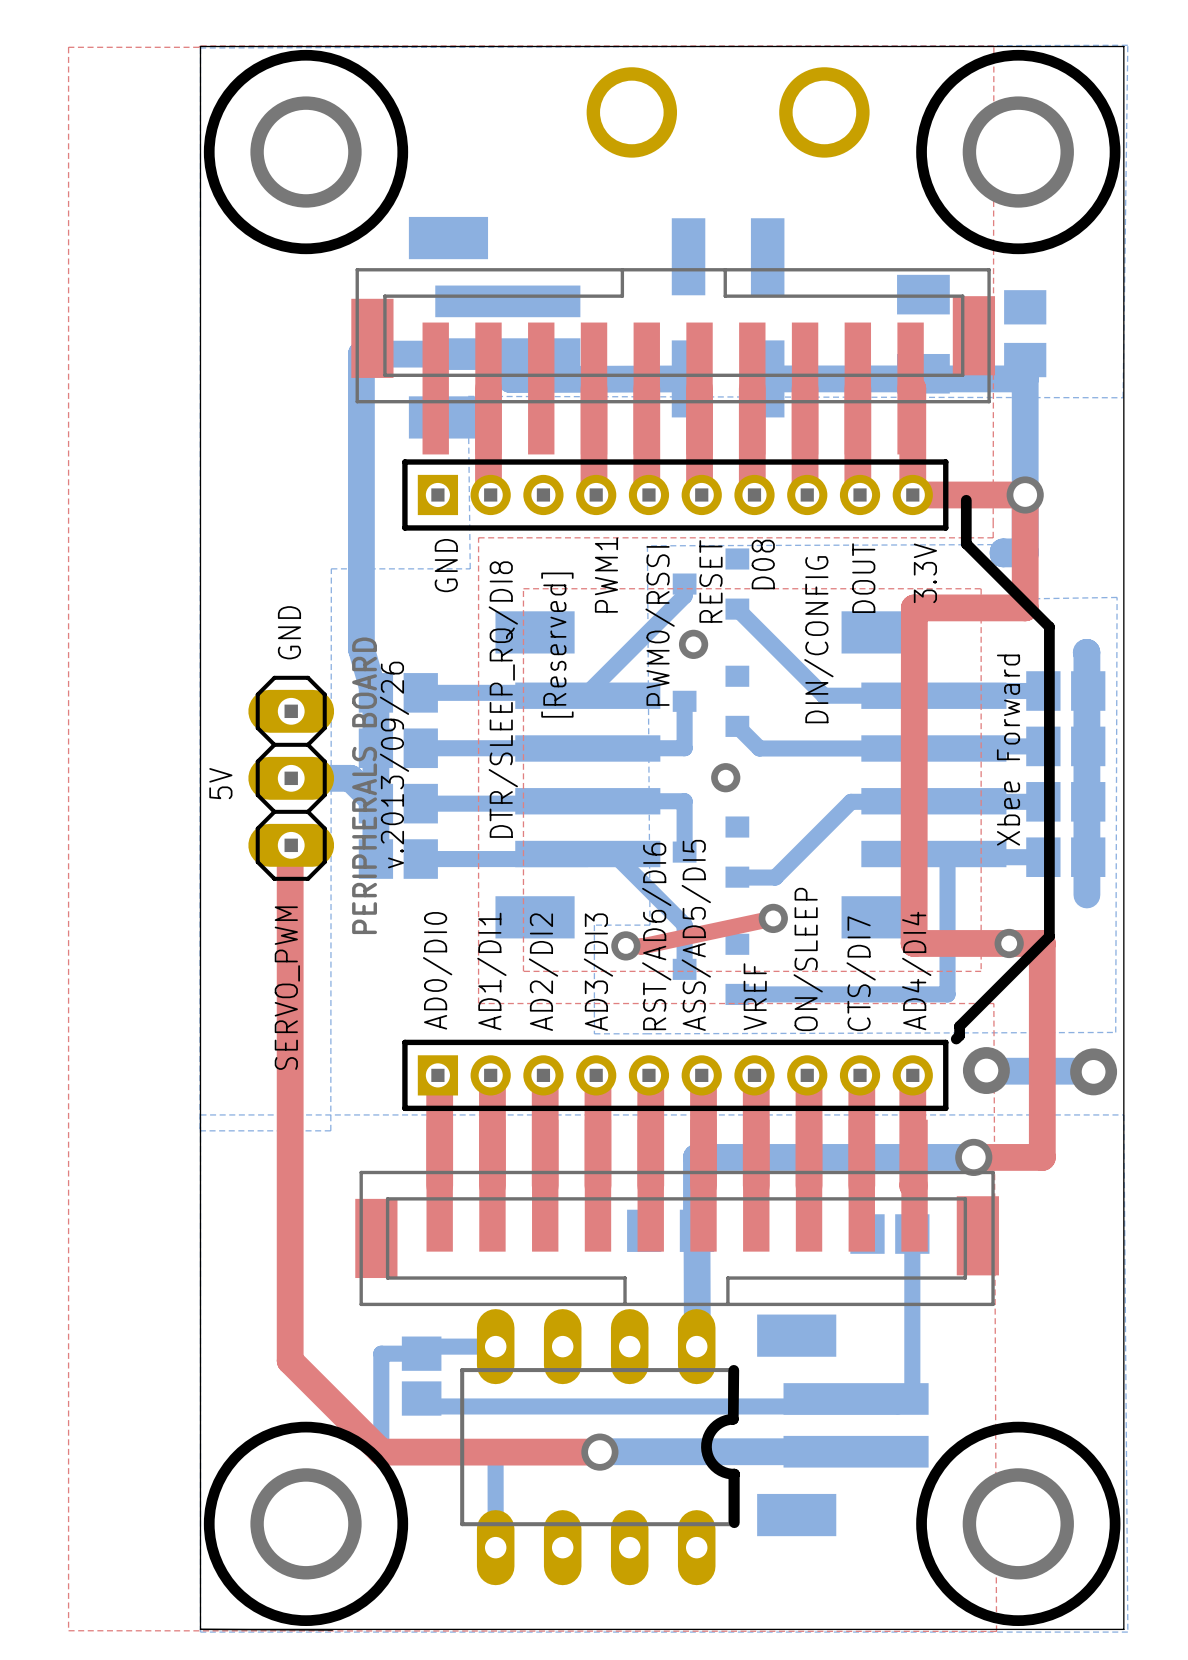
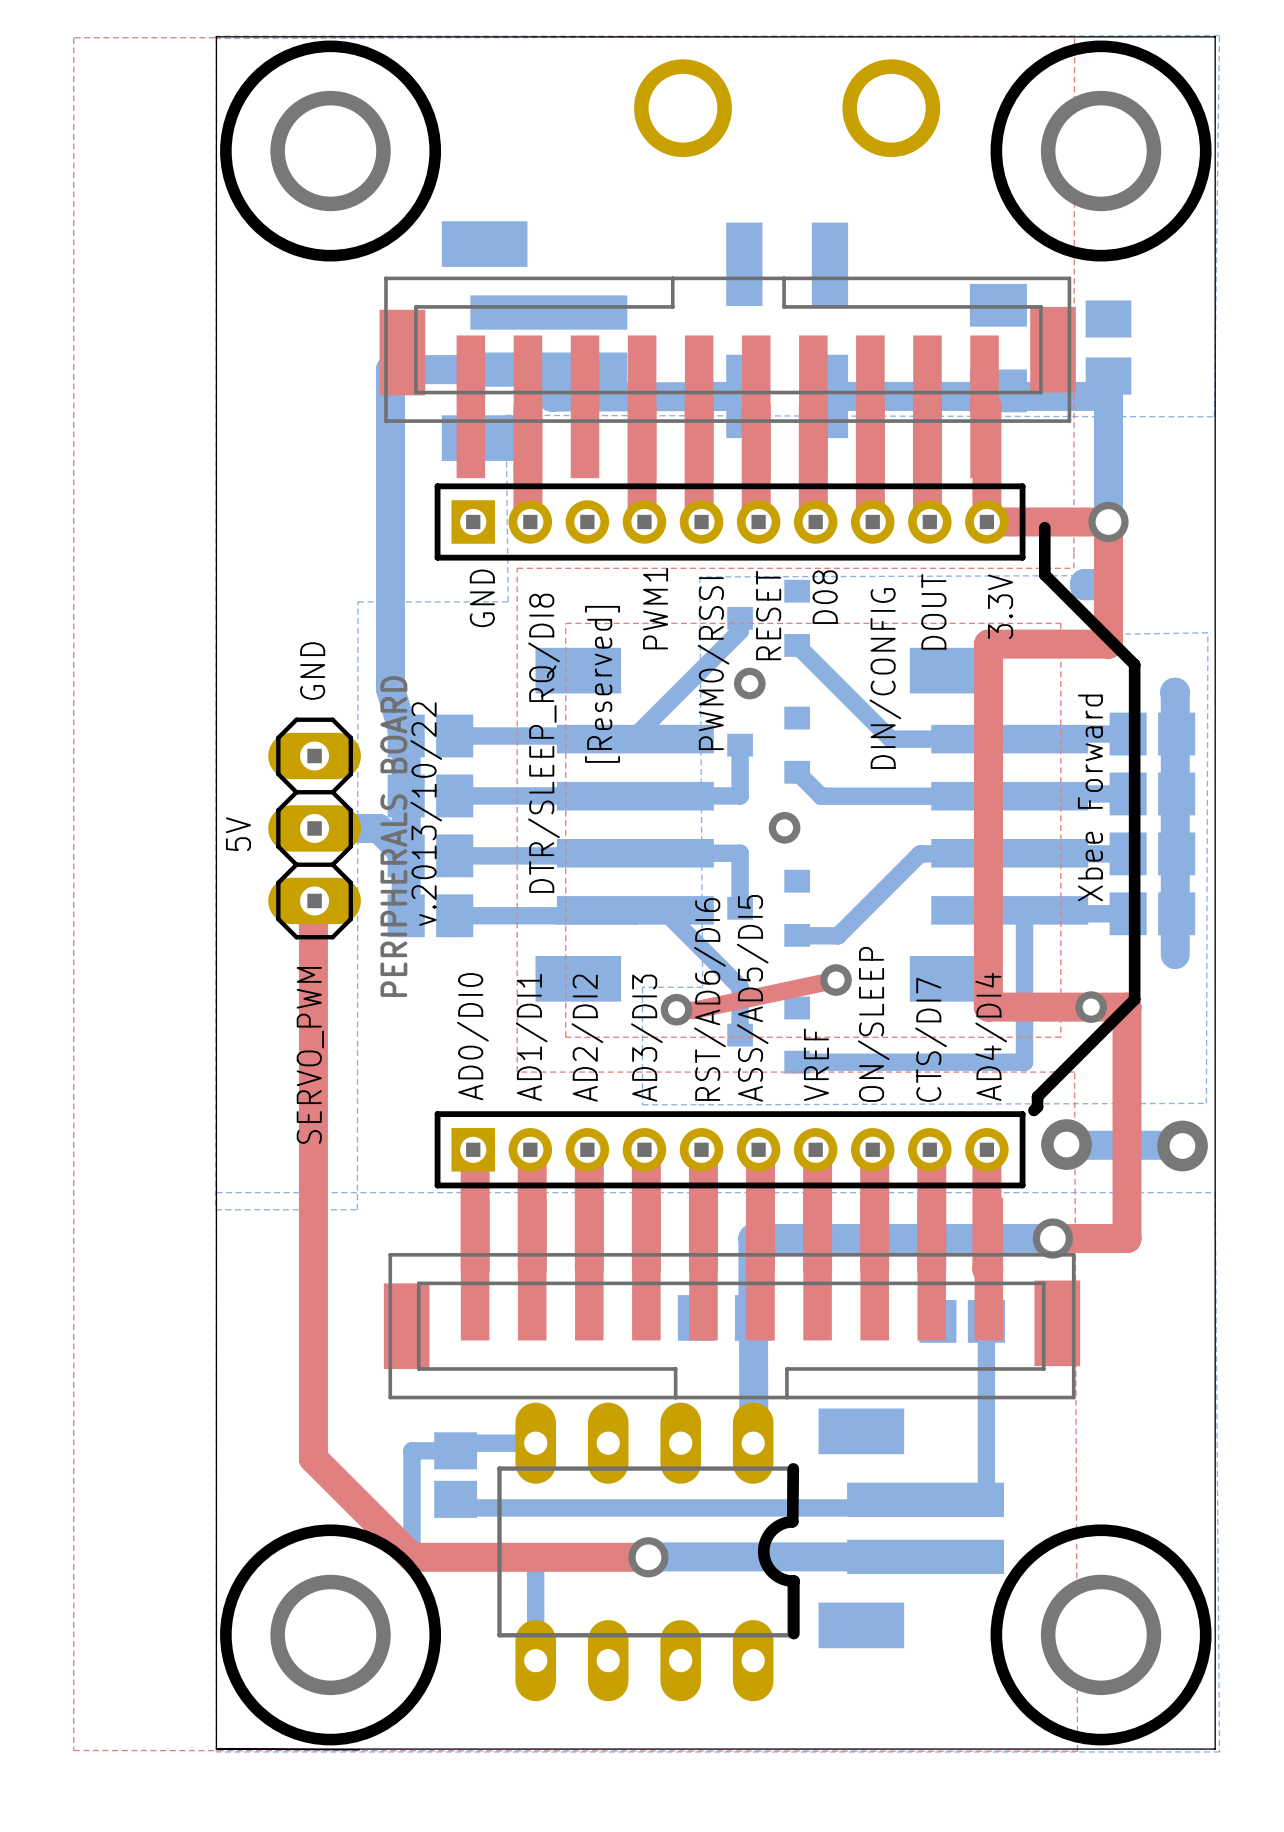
text: v.2013/09/26 (394, 765) -> v.2013/10/22 (426, 814)

